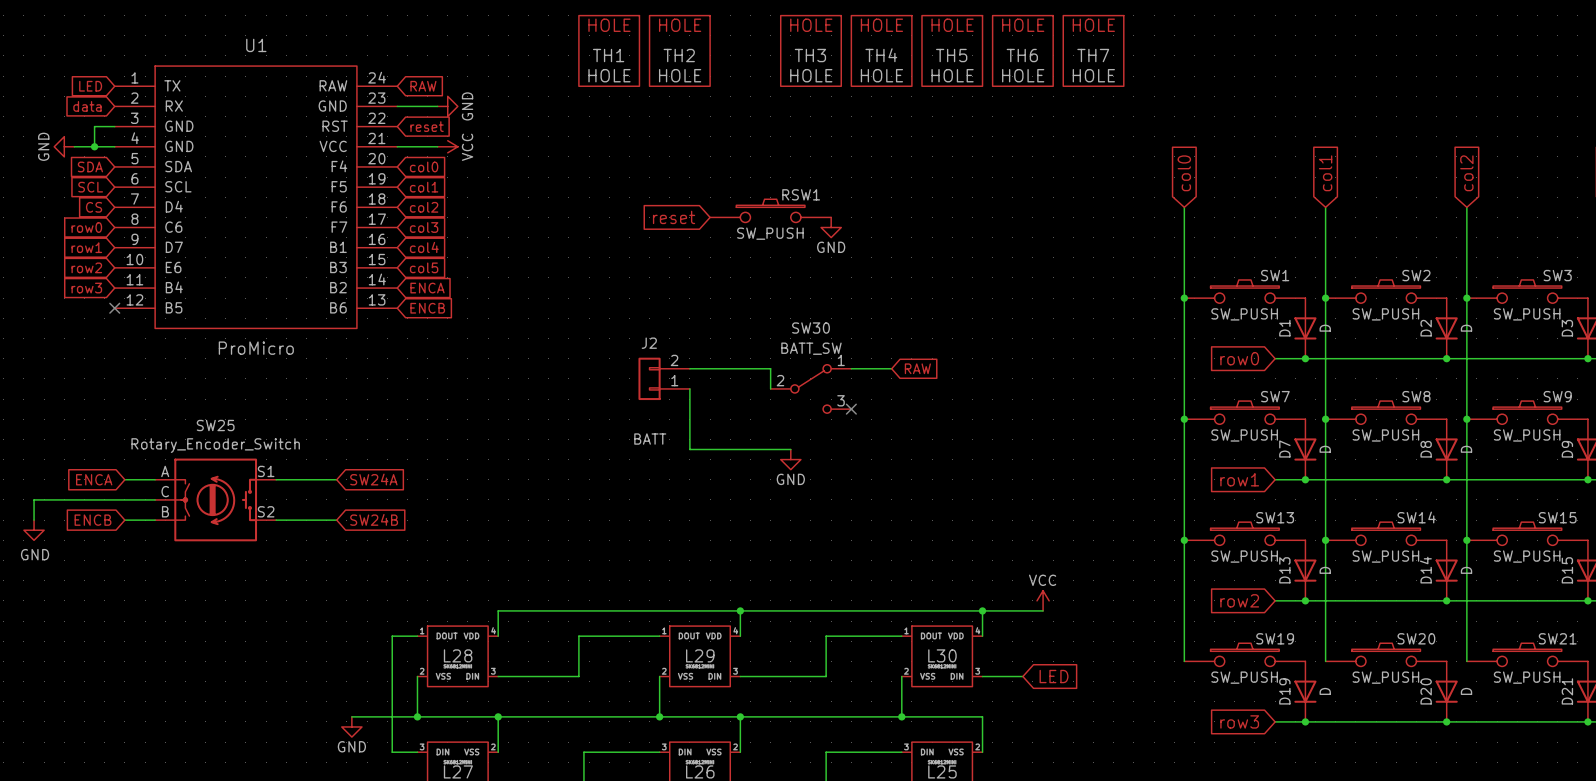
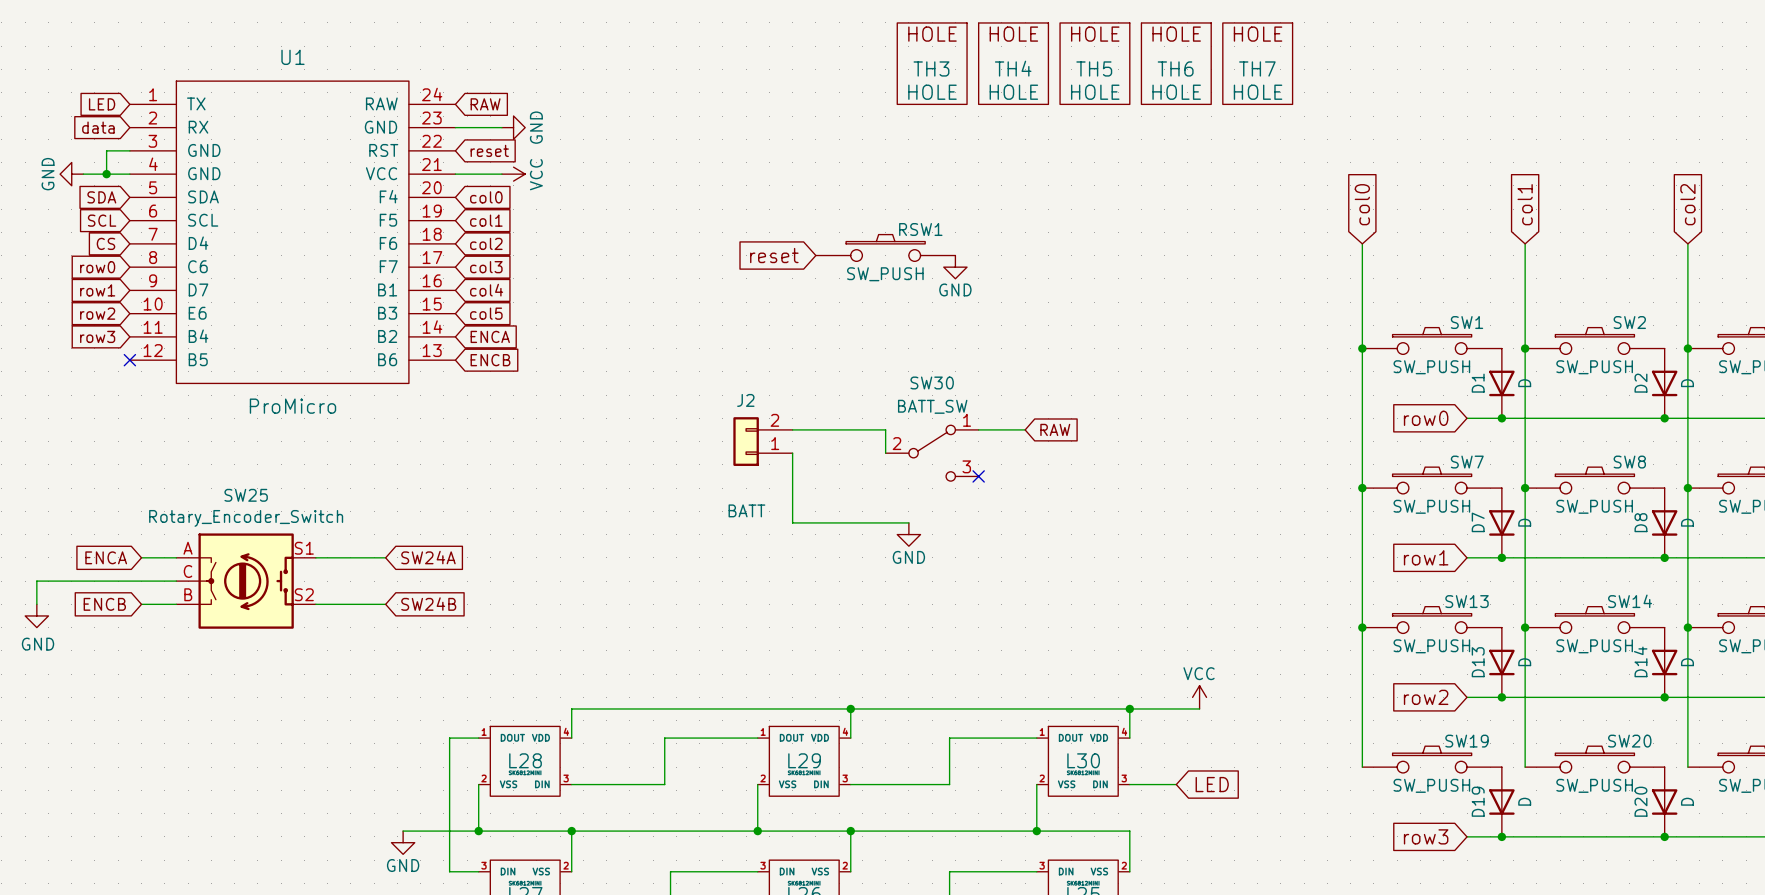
TH1: HOLE (609, 50) -> none
TH2: HOLE (679, 50) -> none

